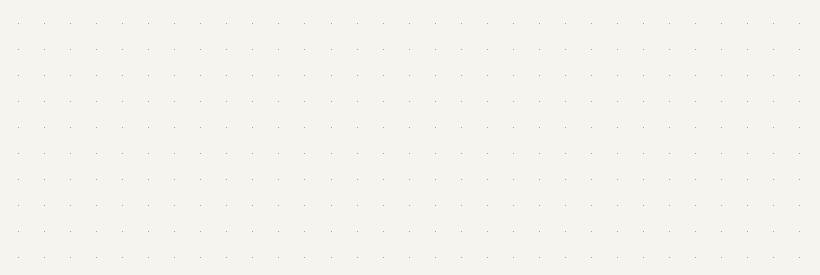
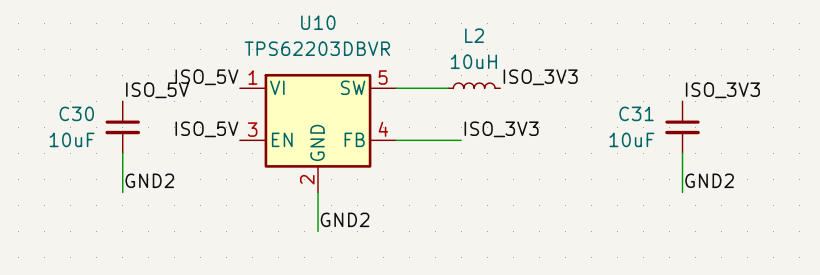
label: none -> ISO_5V (206, 77)
label: none -> ISO_3V3 (540, 77)
L2: none -> 10uH (474, 85)
wire: none -> (396, 88) (448, 88)
label: none -> ISO_5V (157, 90)
label: none -> ISO_3V3 (722, 90)
C30: none -> 10uF (122, 127)
C31: none -> 10uF (682, 127)
label: none -> ISO_5V (206, 129)
label: none -> ISO_3V3 (501, 129)
U10: none -> TPS62203DBVR (318, 133)
wire: none -> (396, 140) (461, 140)
wire: none -> (122, 153) (122, 192)
wire: none -> (682, 153) (682, 192)
label: none -> GND2 (149, 180)
label: none -> GND2 (709, 180)
wire: none -> (318, 192) (318, 231)
label: none -> GND2 (345, 219)

